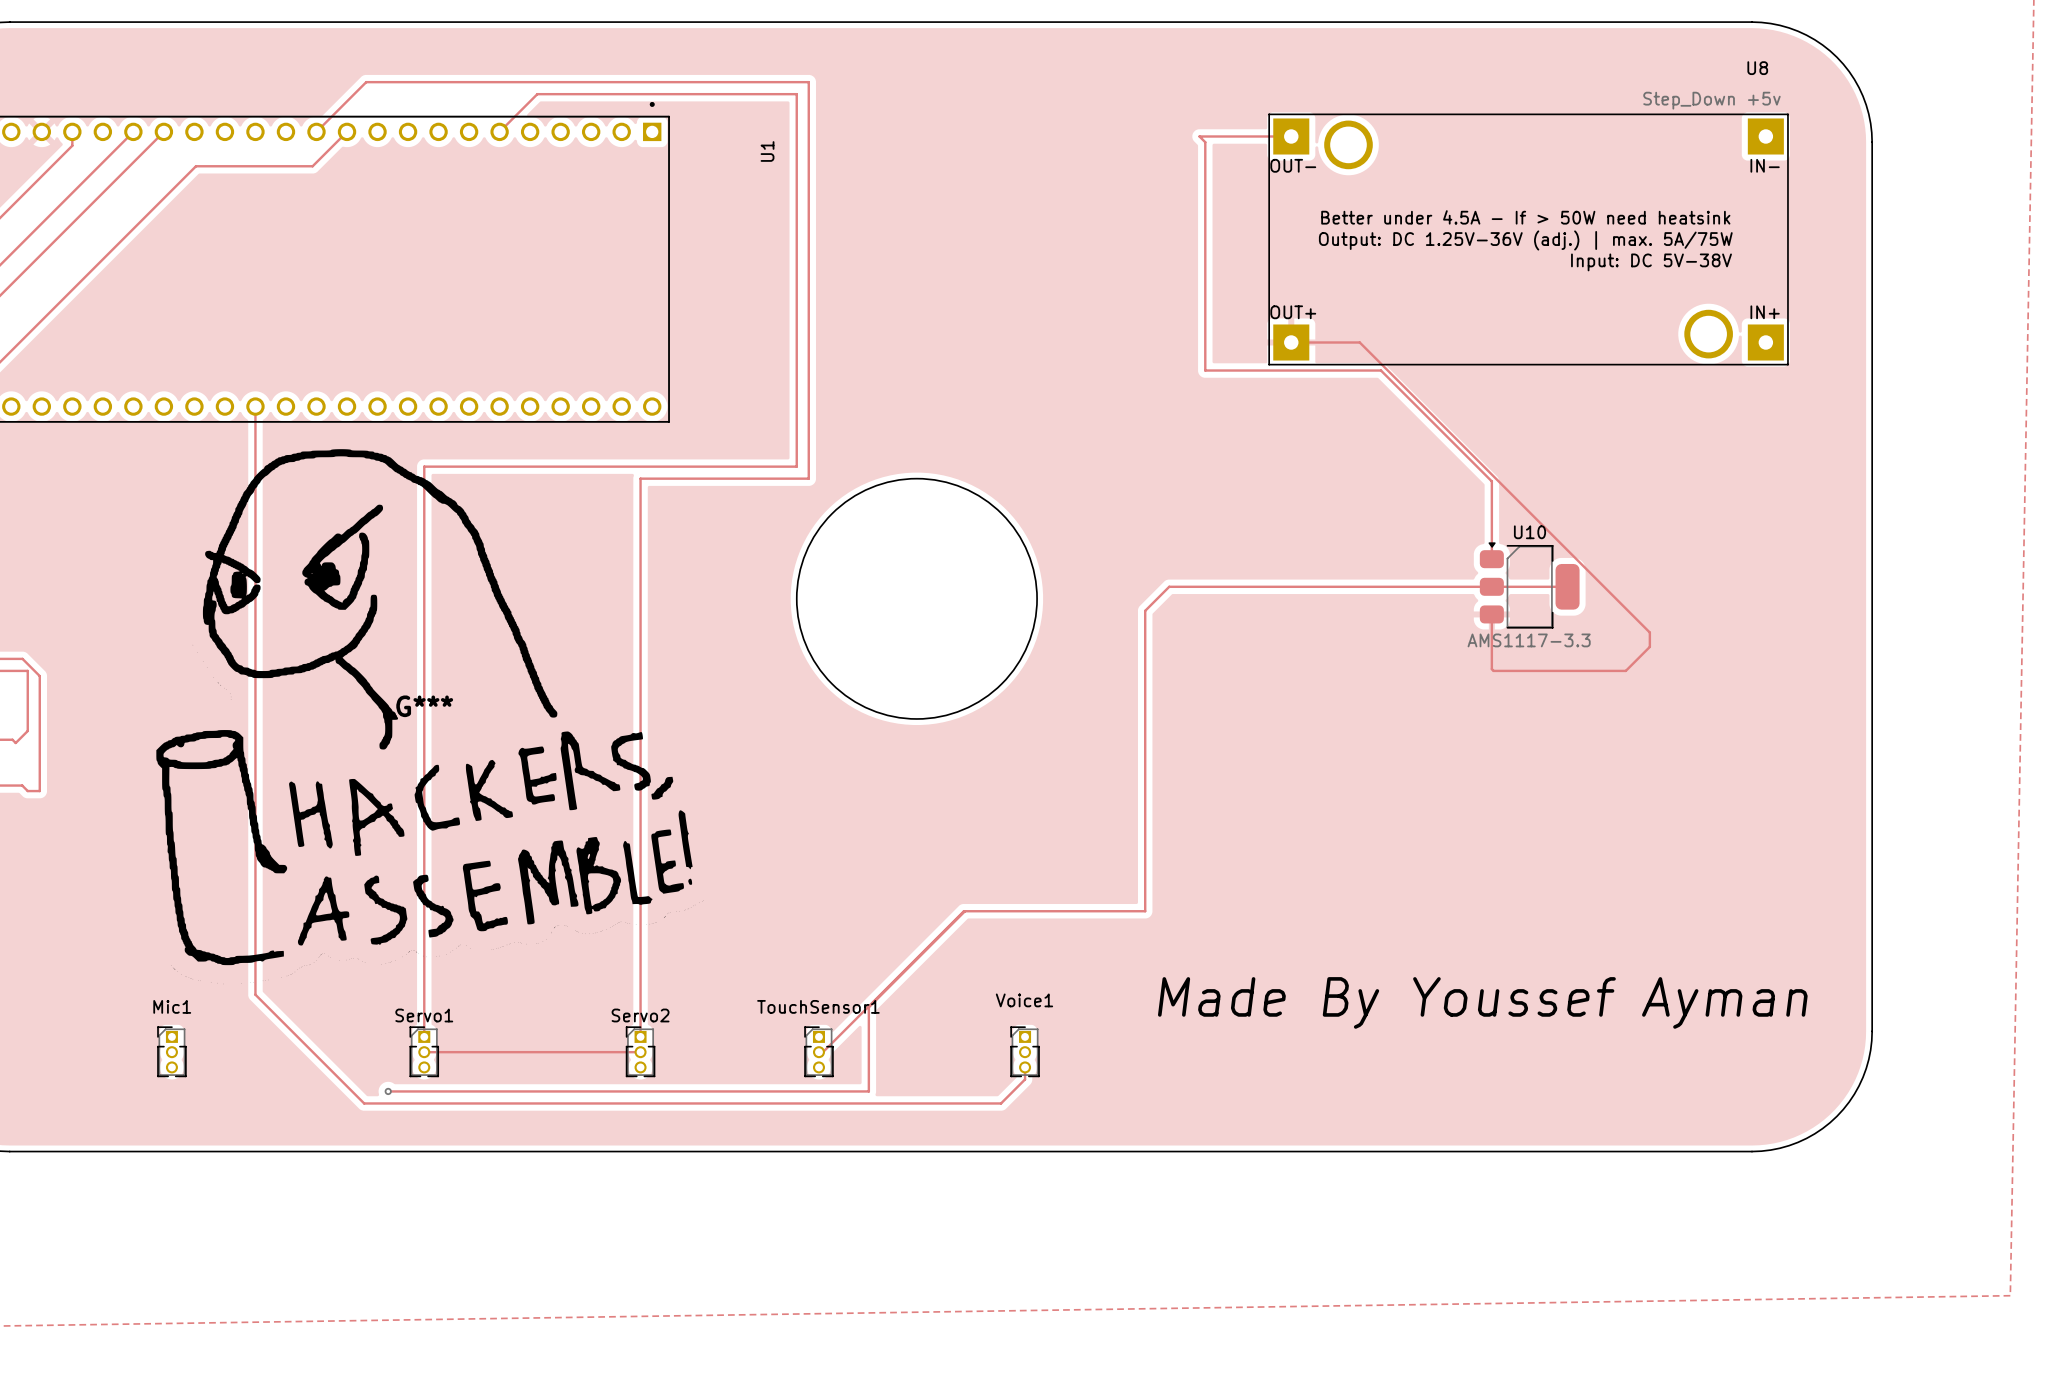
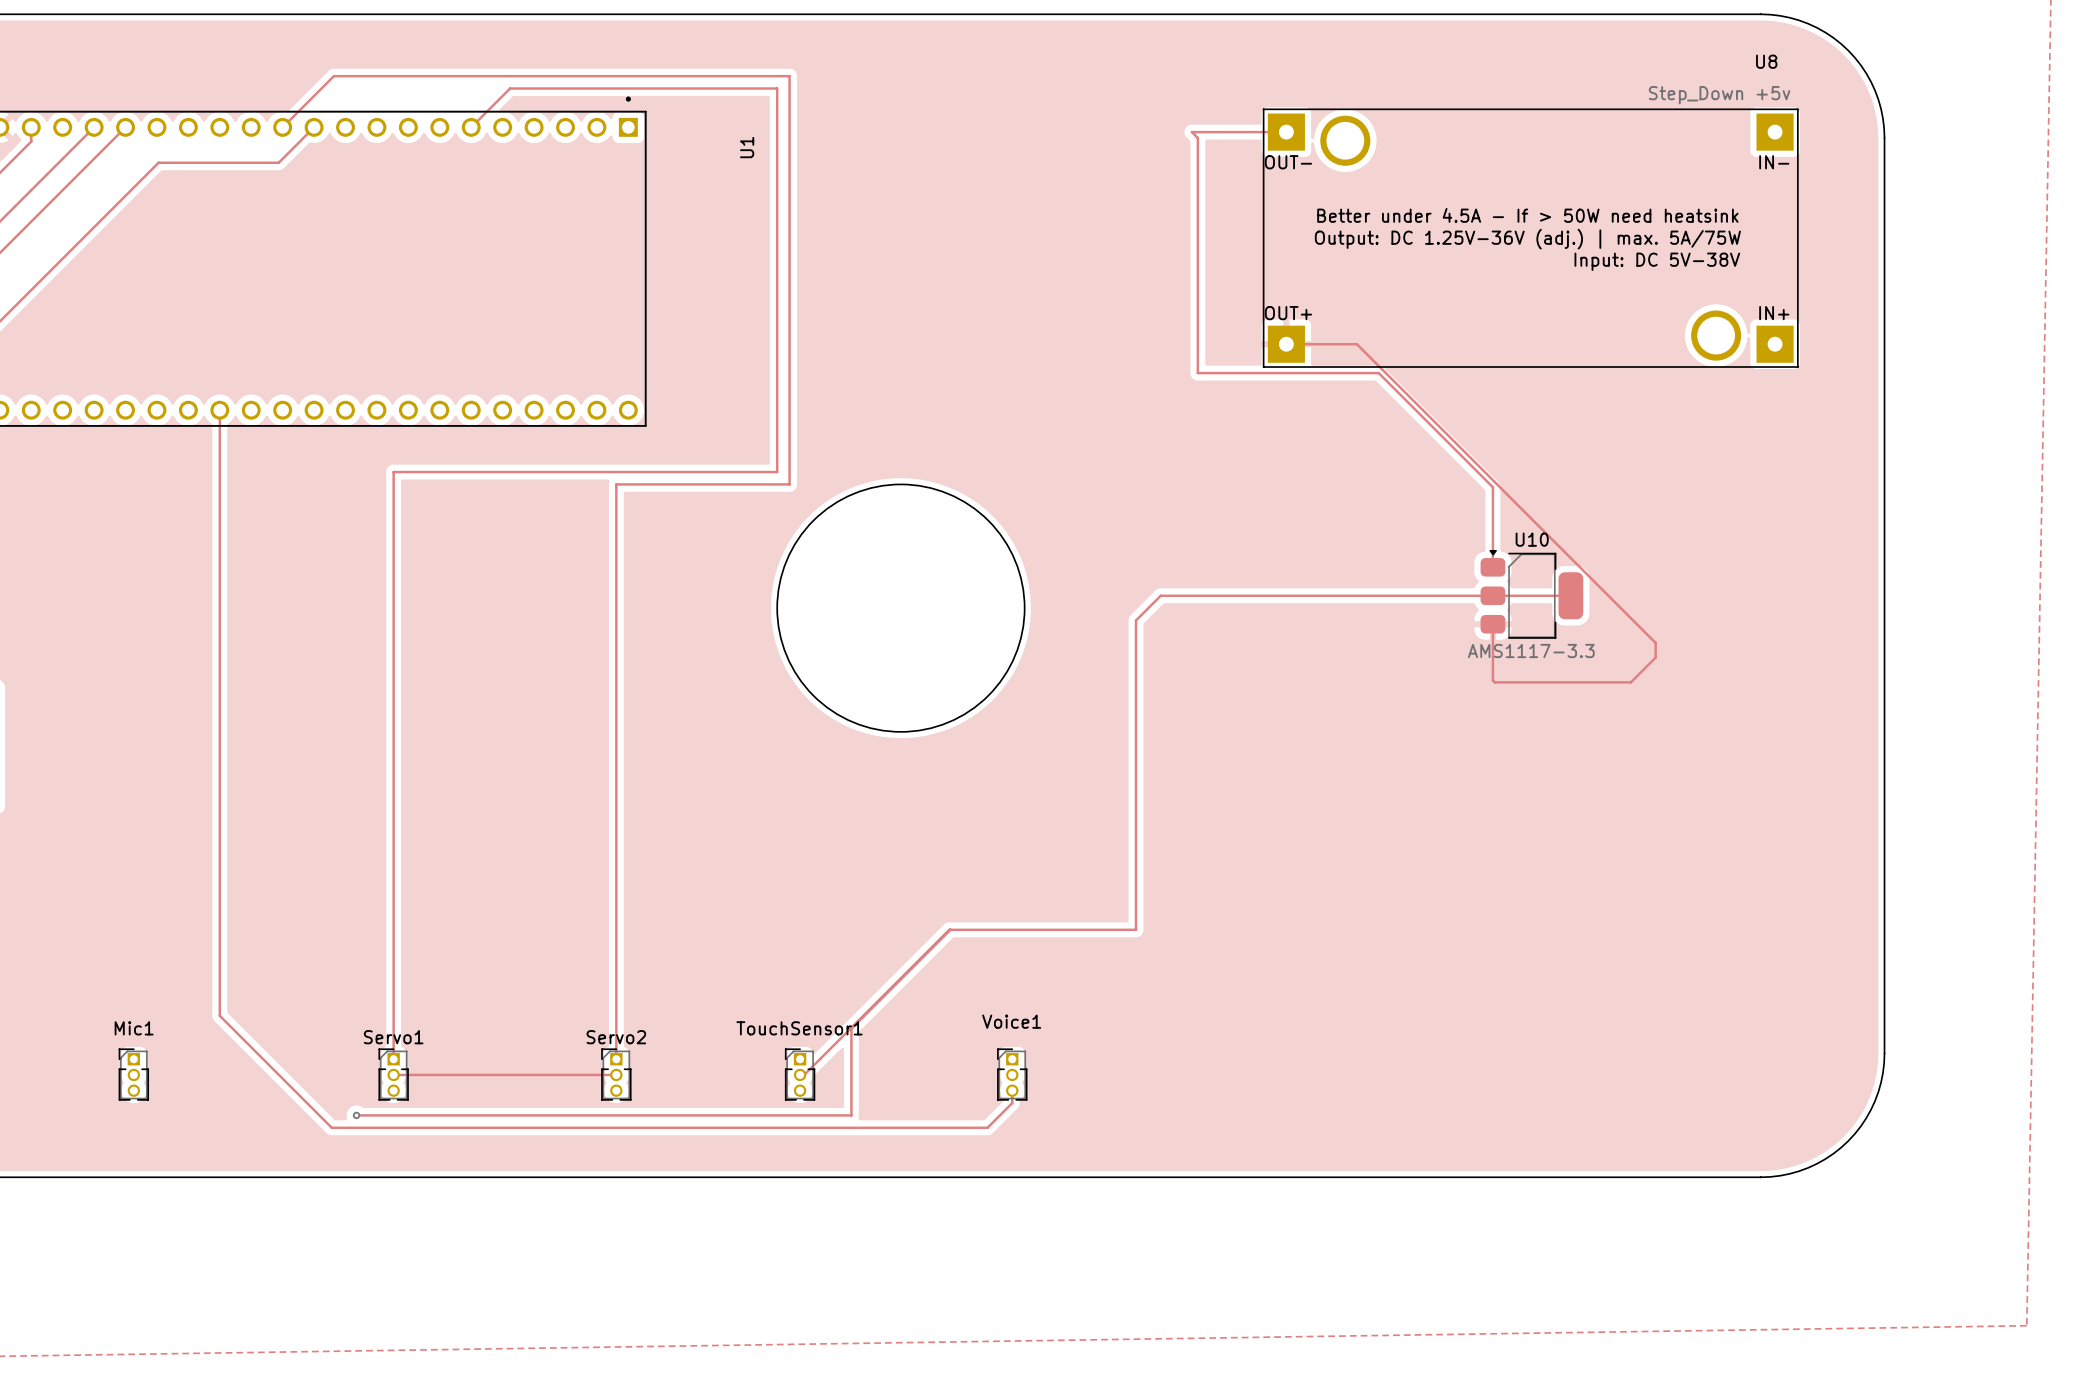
G***: (430, 716) -> none
text: Made By Youssef Ayman (1482, 1002) -> none

